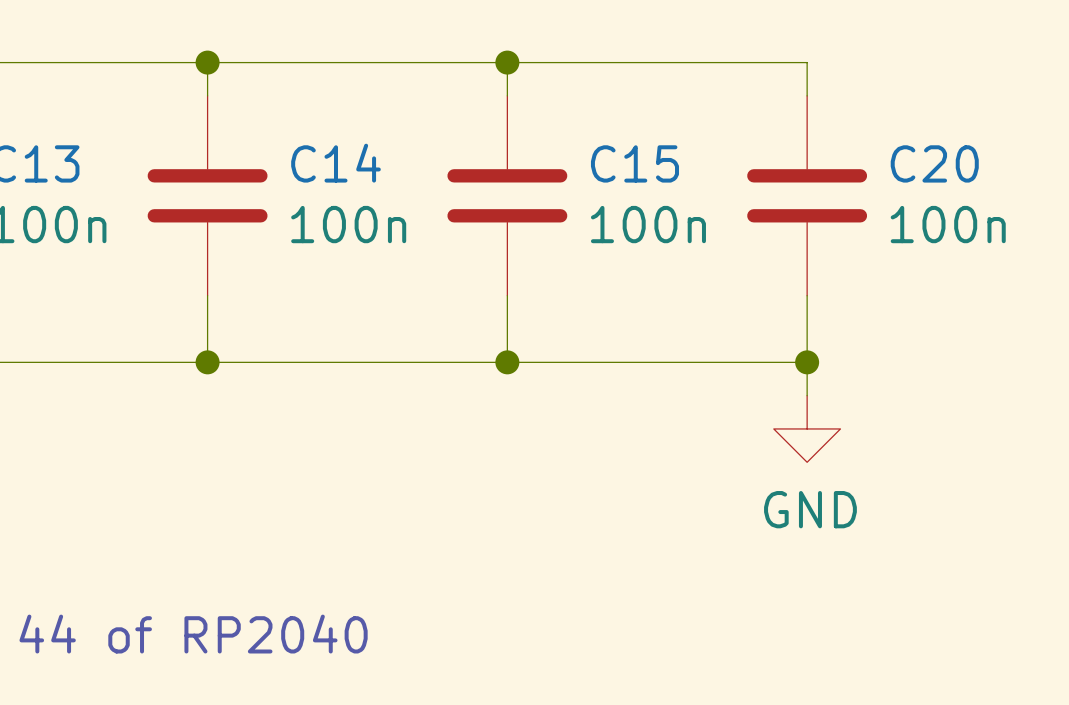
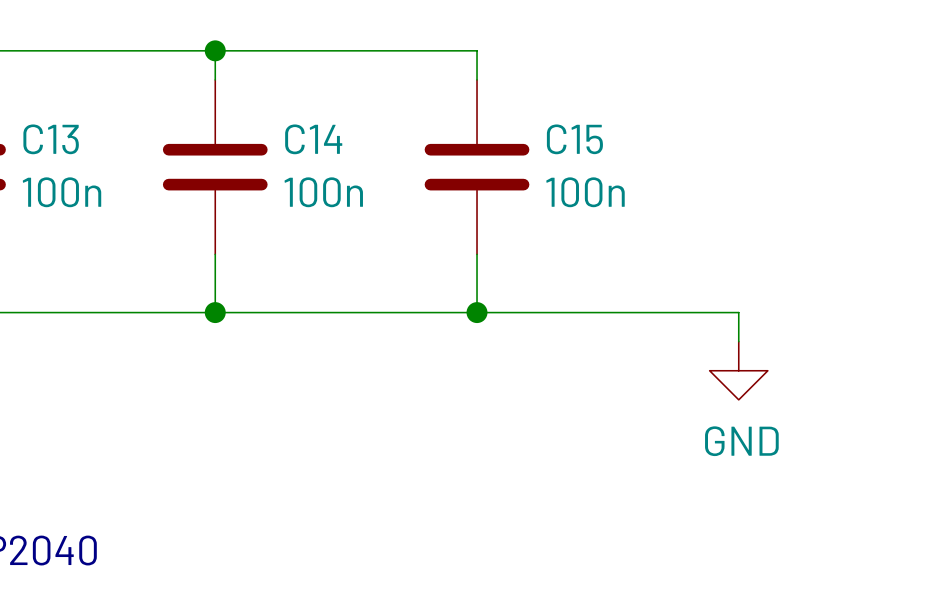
wire: (507, 62) (807, 62) (807, 95) -> none
junction: (507, 62) -> none
C20: 100n (807, 195) -> none
wire: (807, 295) (807, 362) -> none
junction: (807, 362) -> none

